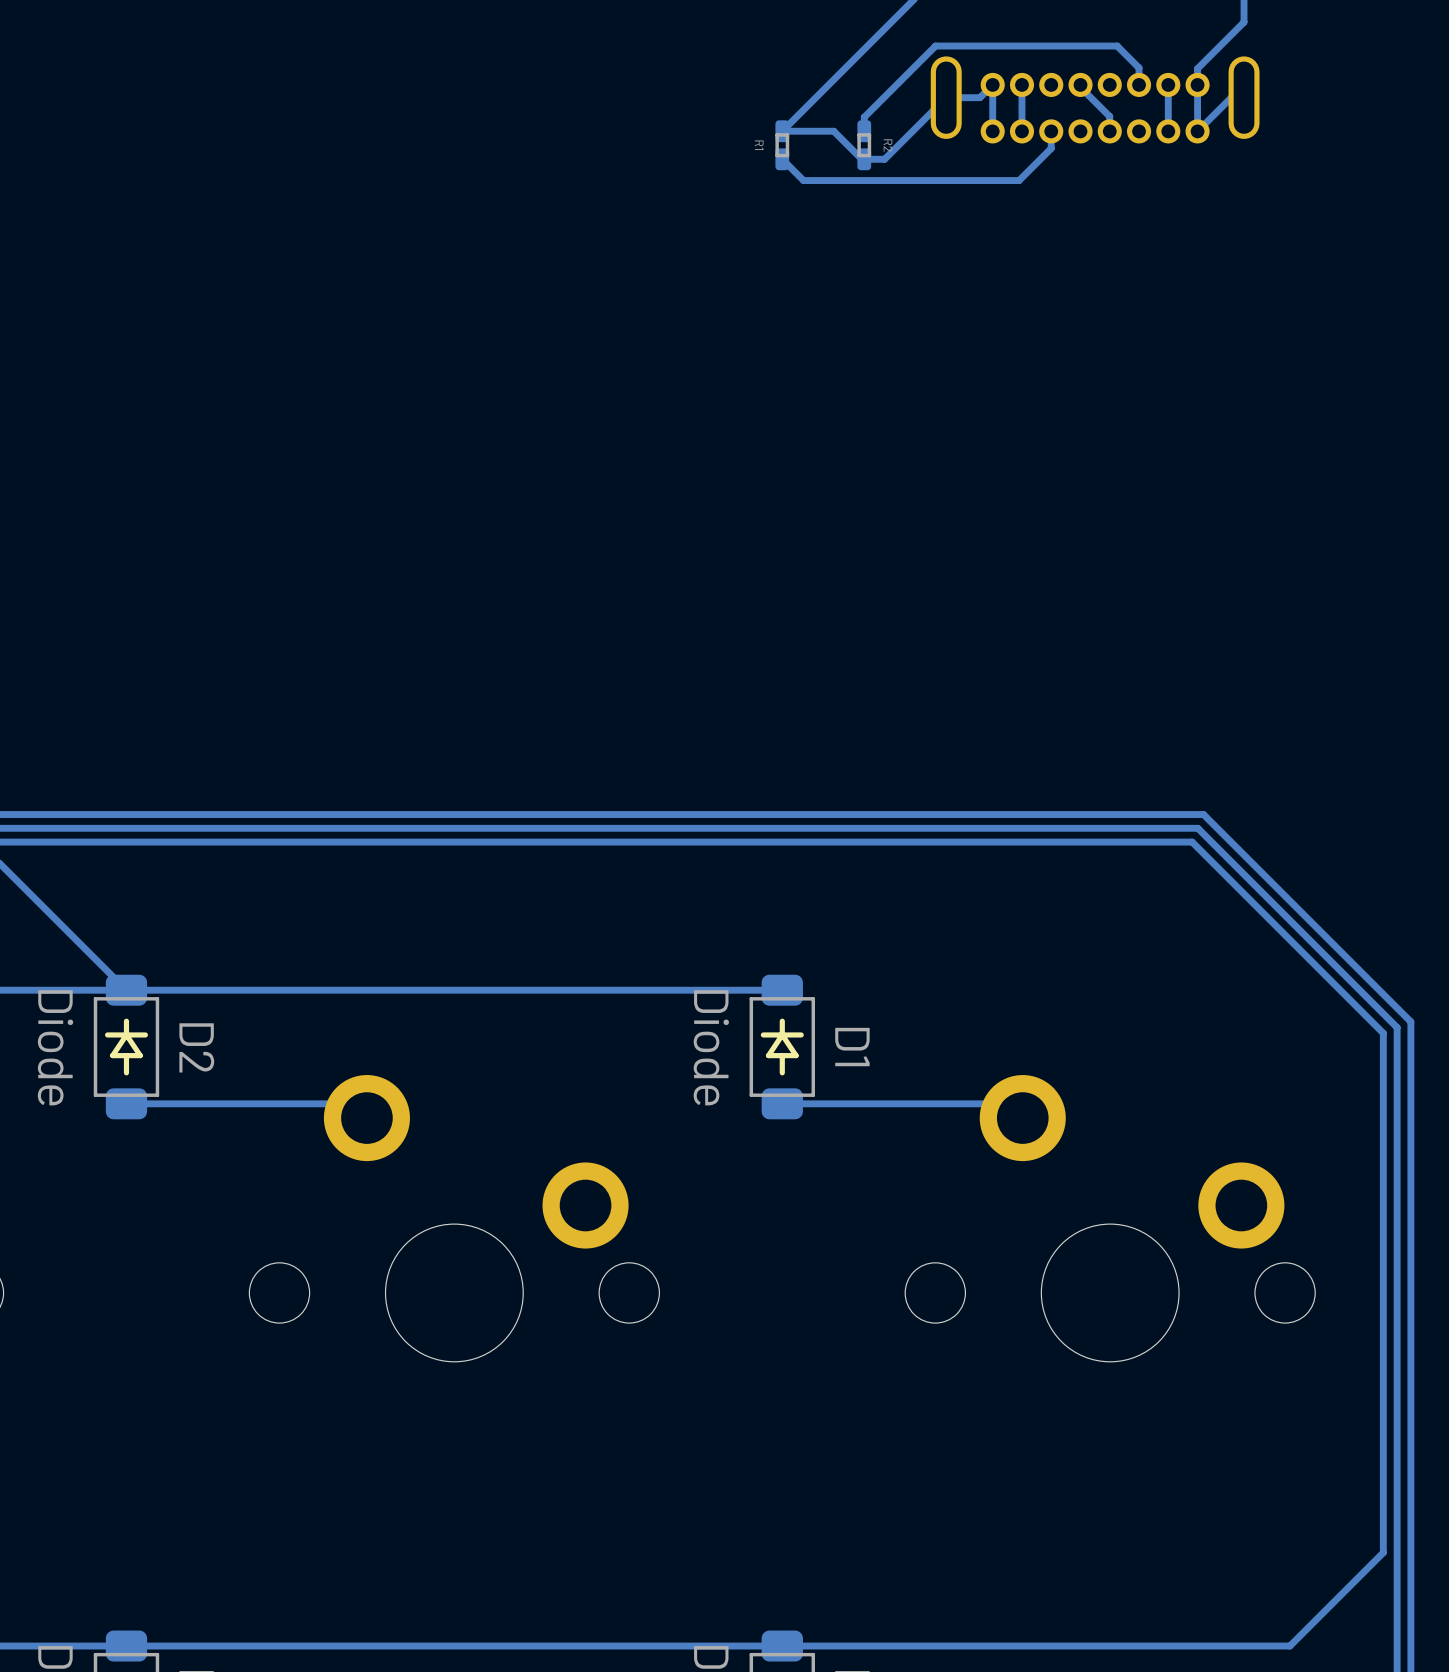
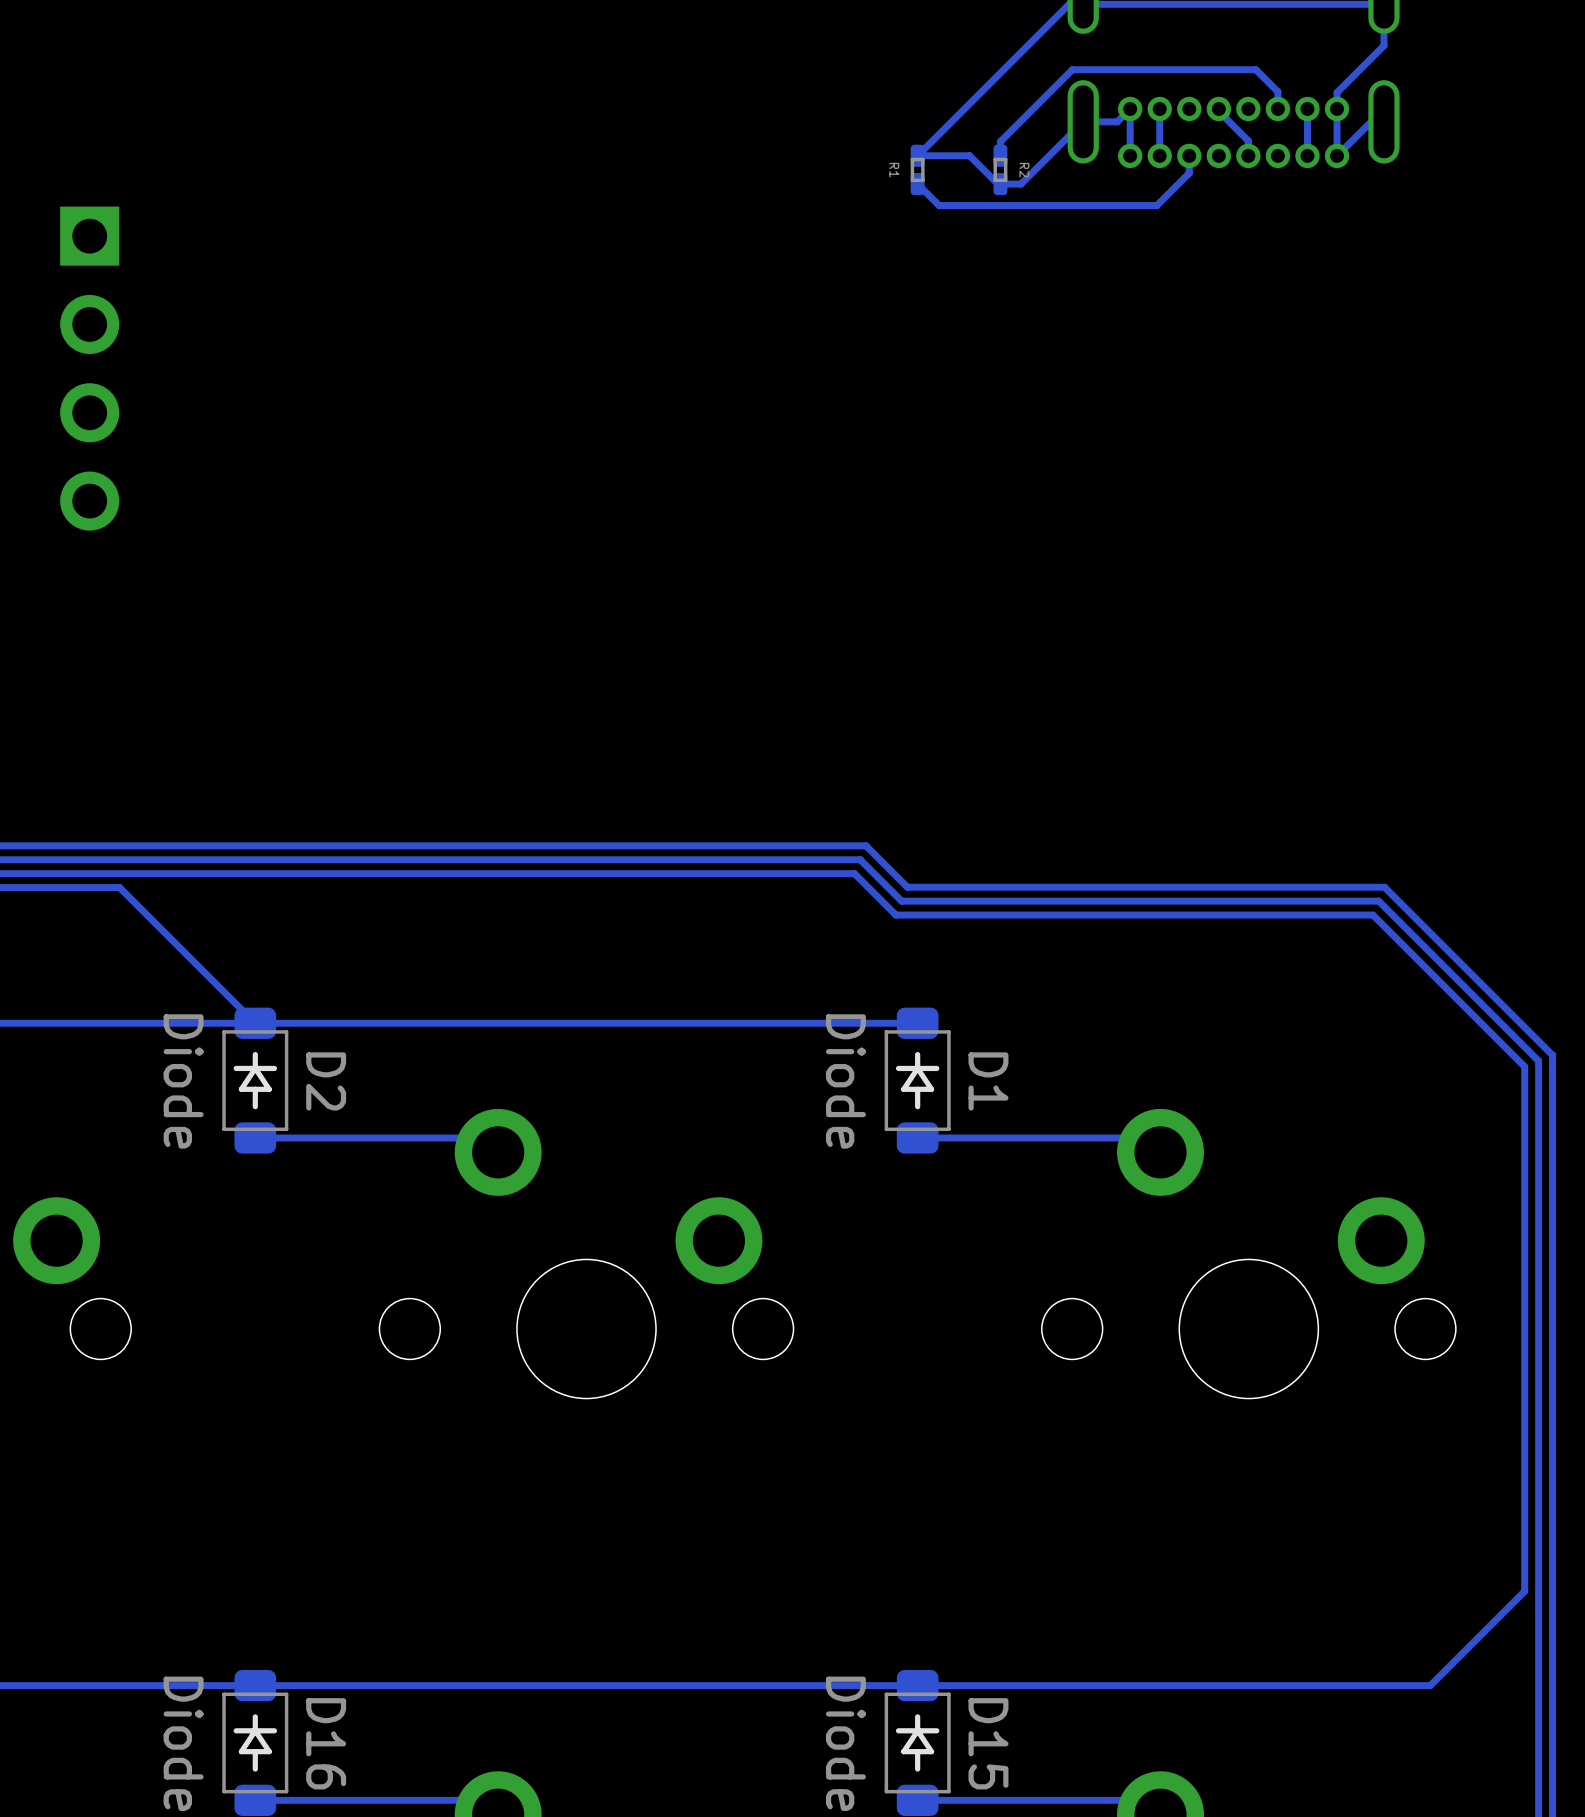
track: (731, 814) (1203, 814) (1244, 855) -> (866, 845) (907, 887) (1384, 887)
track: (725, 828) (1197, 828) (1238, 869) -> (860, 859) (901, 901) (1378, 901)
track: (719, 842) (1192, 842) (1233, 883) -> (854, 873) (895, 915) (1373, 915)

